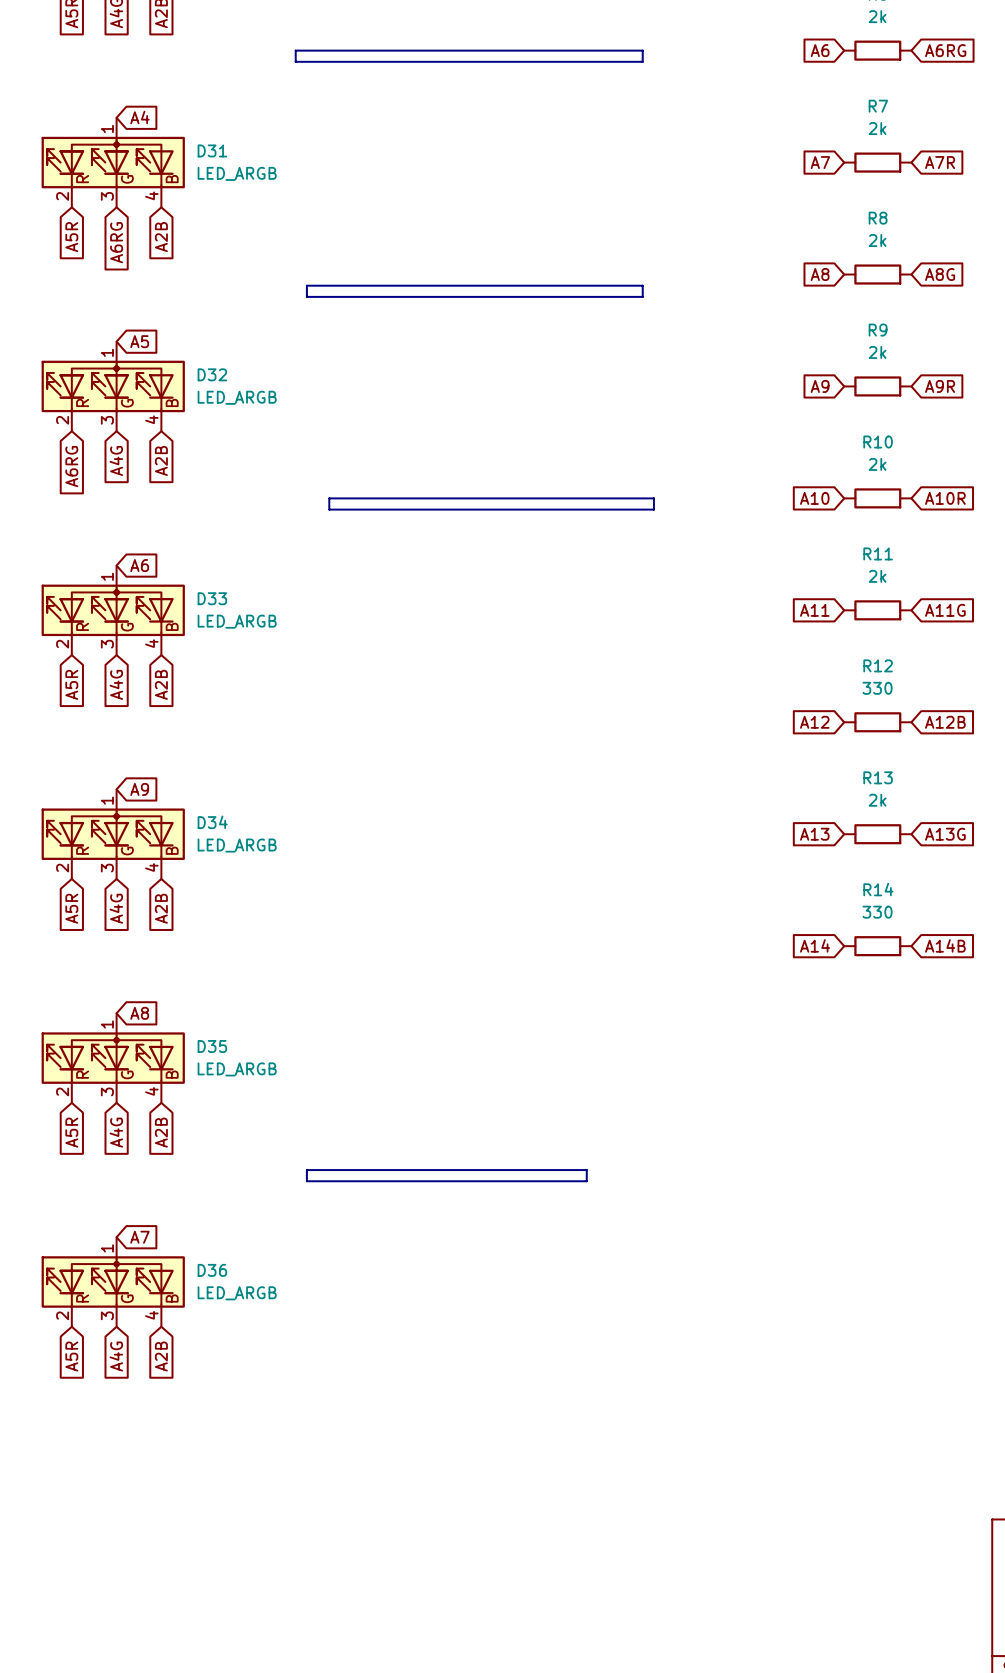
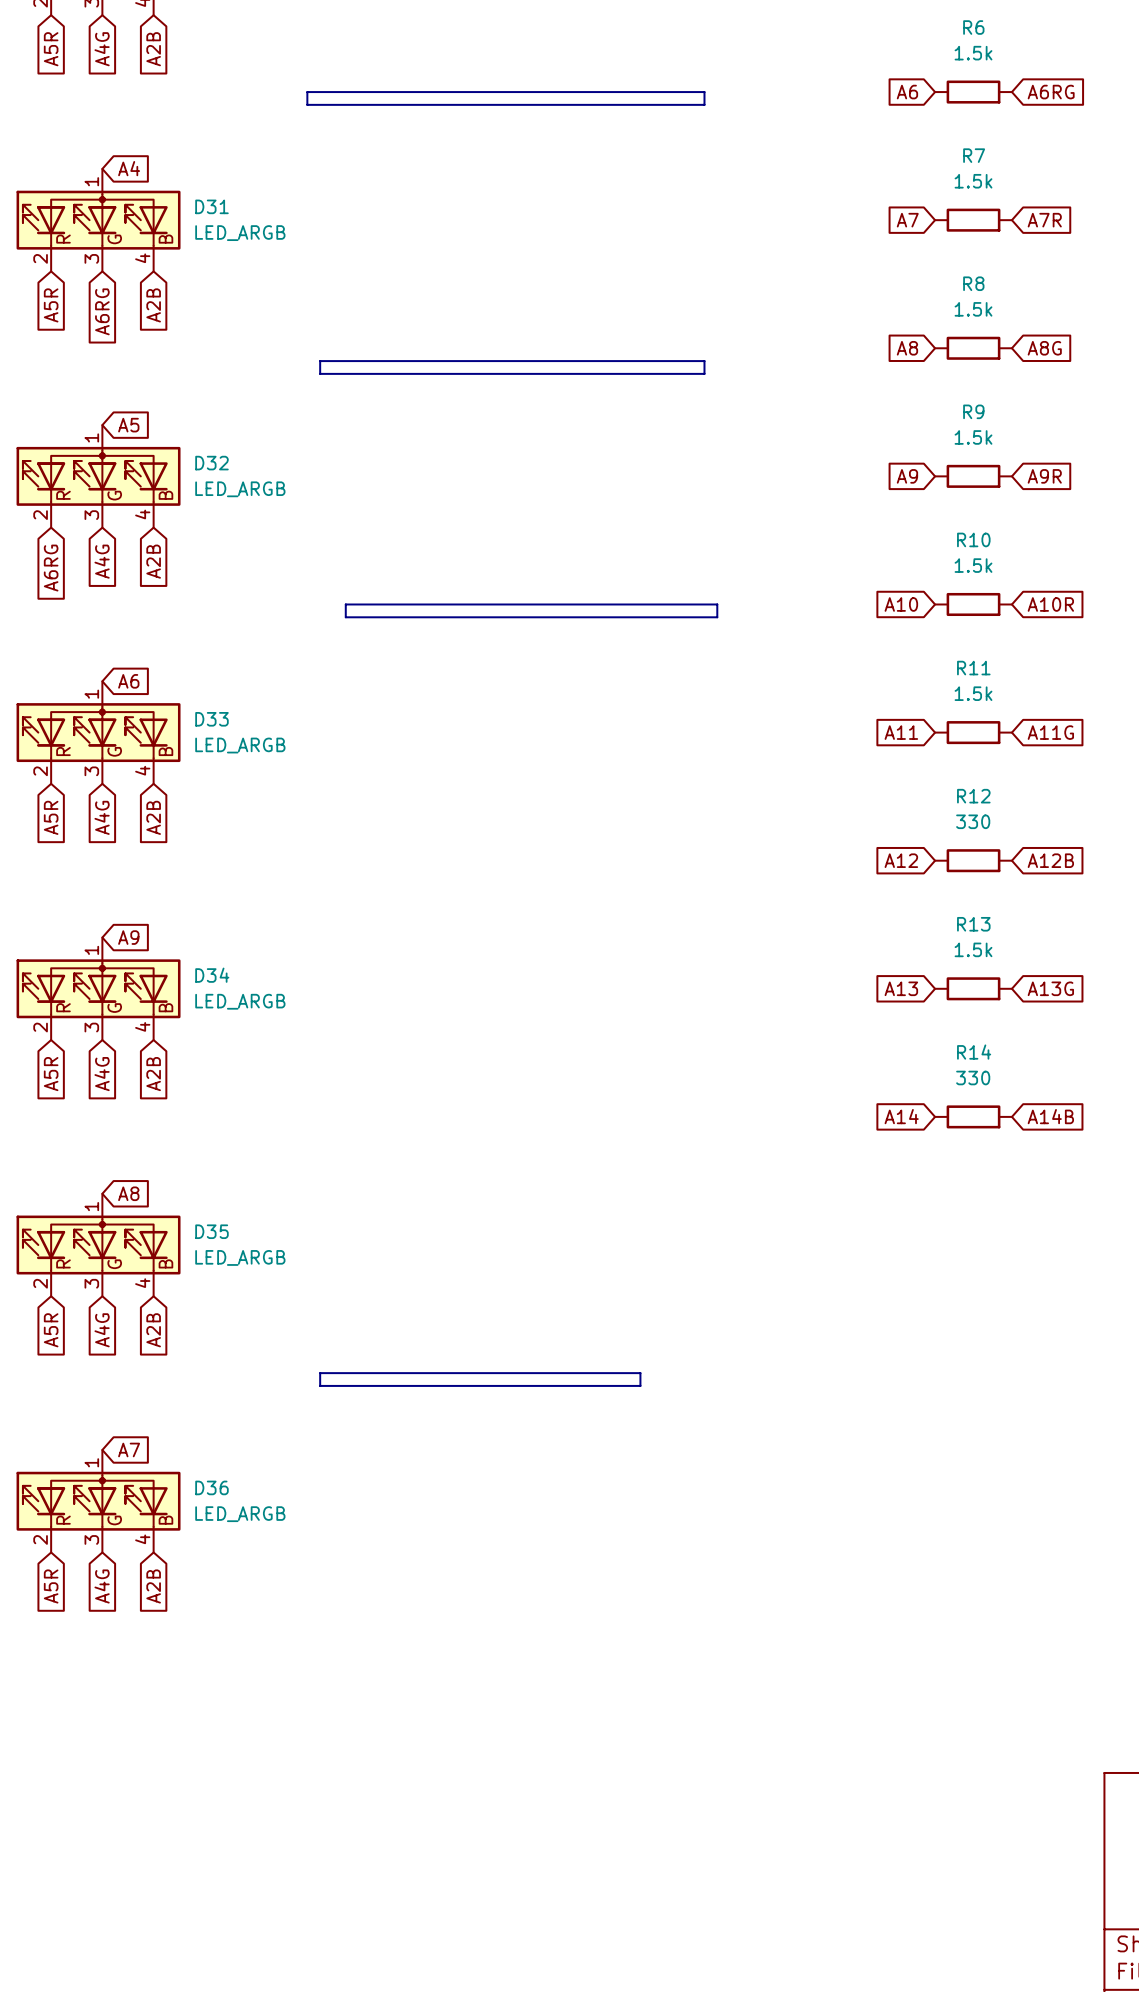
R6 value: 2k (877, 16) -> 1.5k (973, 53)
R7 value: 2k (877, 128) -> 1.5k (973, 181)
R8 value: 2k (877, 240) -> 1.5k (973, 309)
R9 value: 2k (877, 352) -> 1.5k (973, 437)
R10 value: 2k (877, 464) -> 1.5k (973, 565)
R11 value: 2k (877, 576) -> 1.5k (973, 693)
R13 value: 2k (877, 800) -> 1.5k (973, 949)

